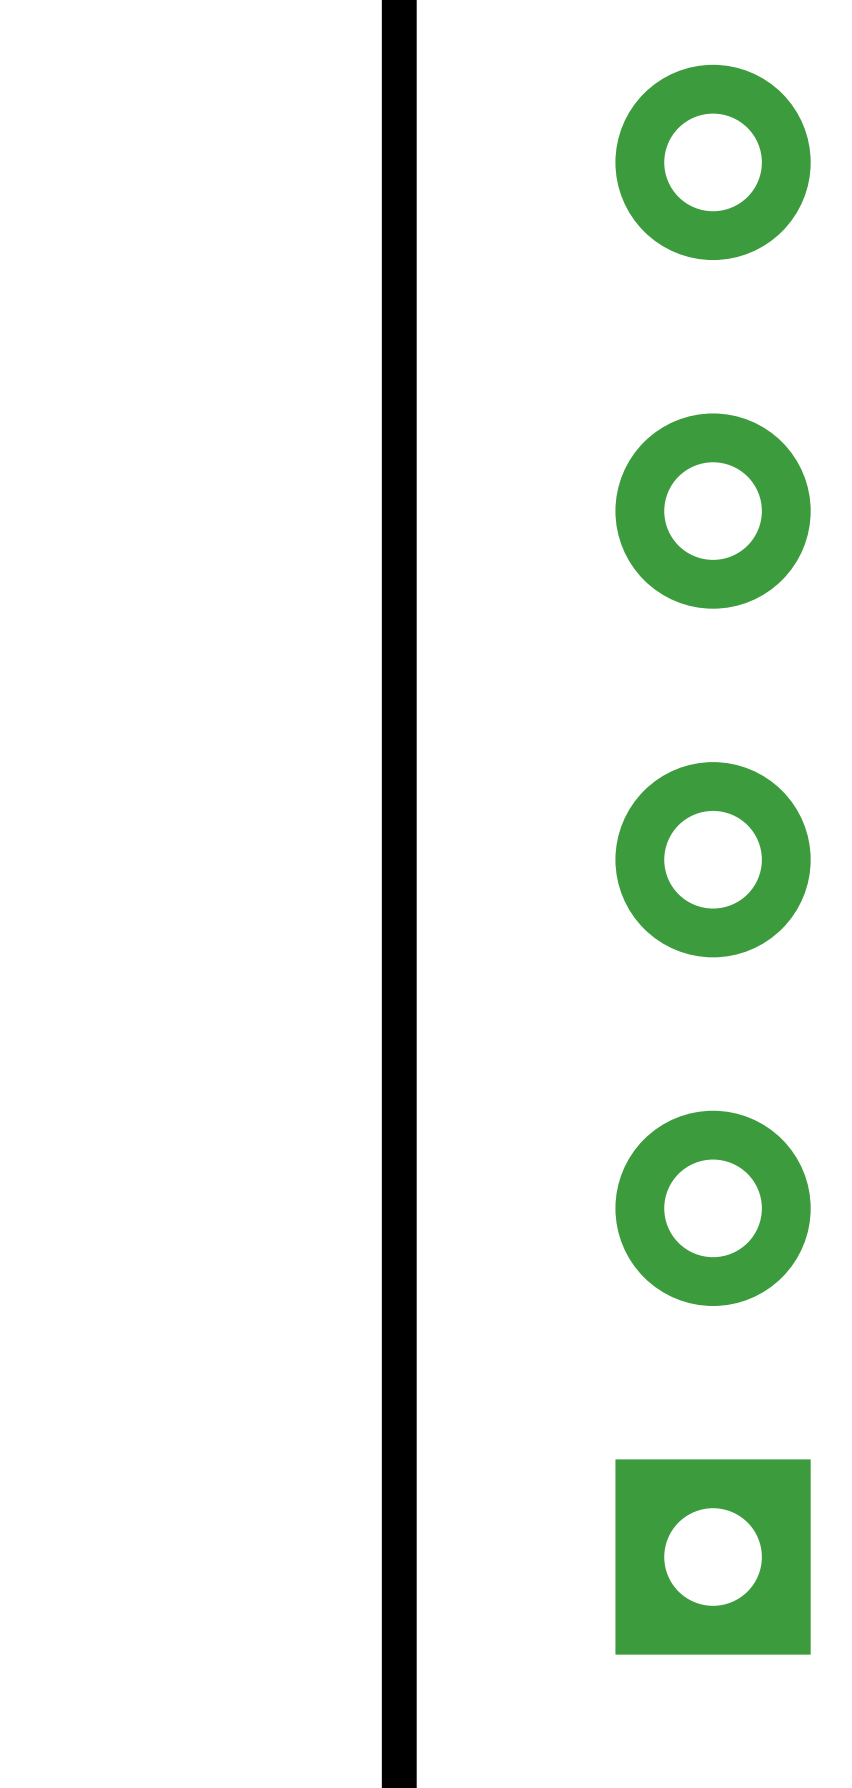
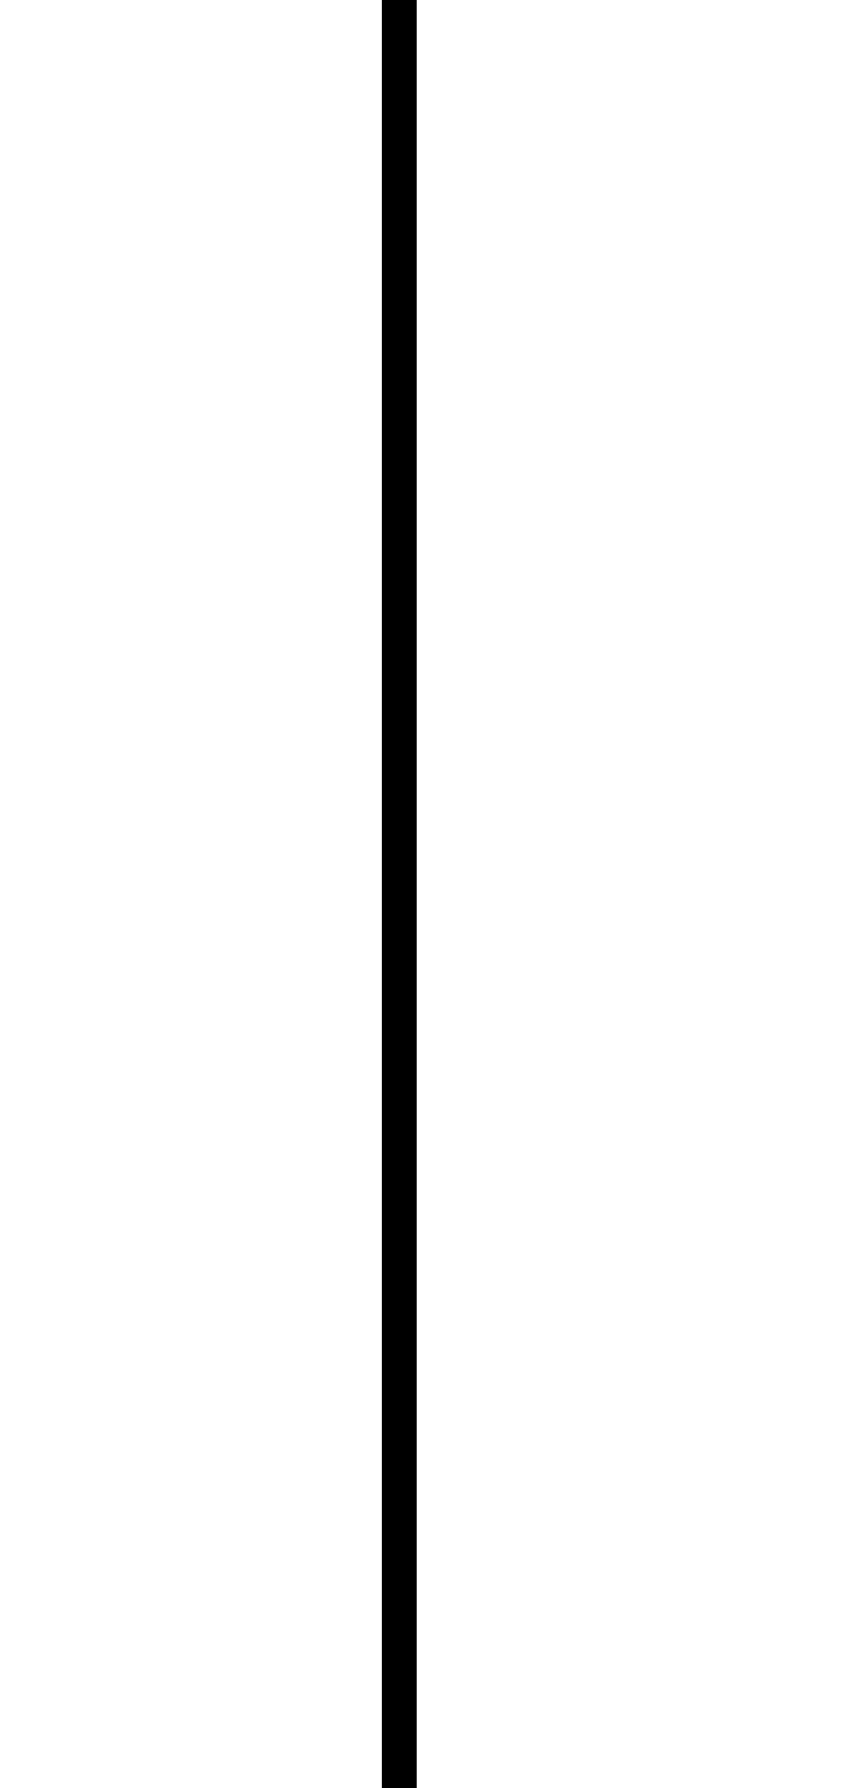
part: (713, 859) -> none

